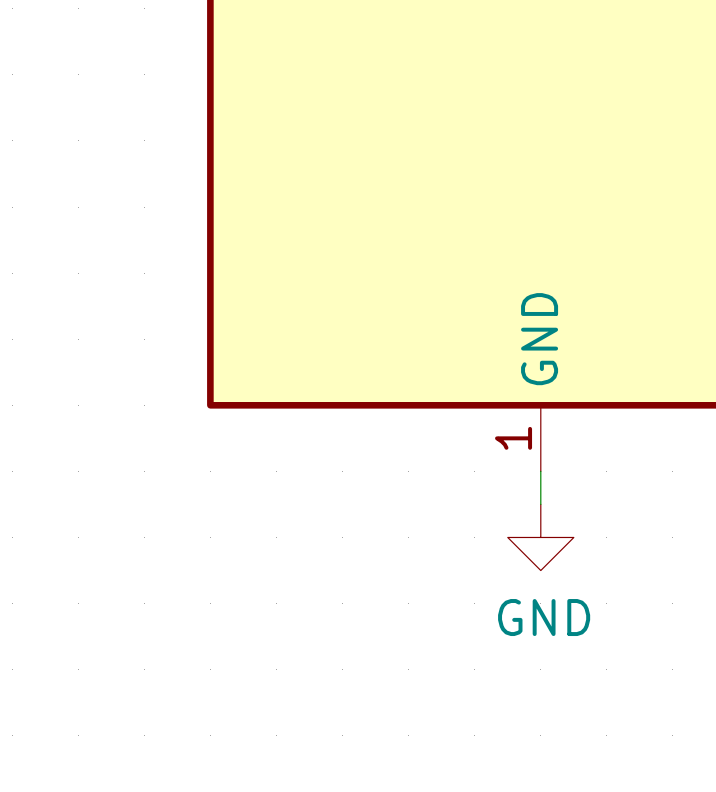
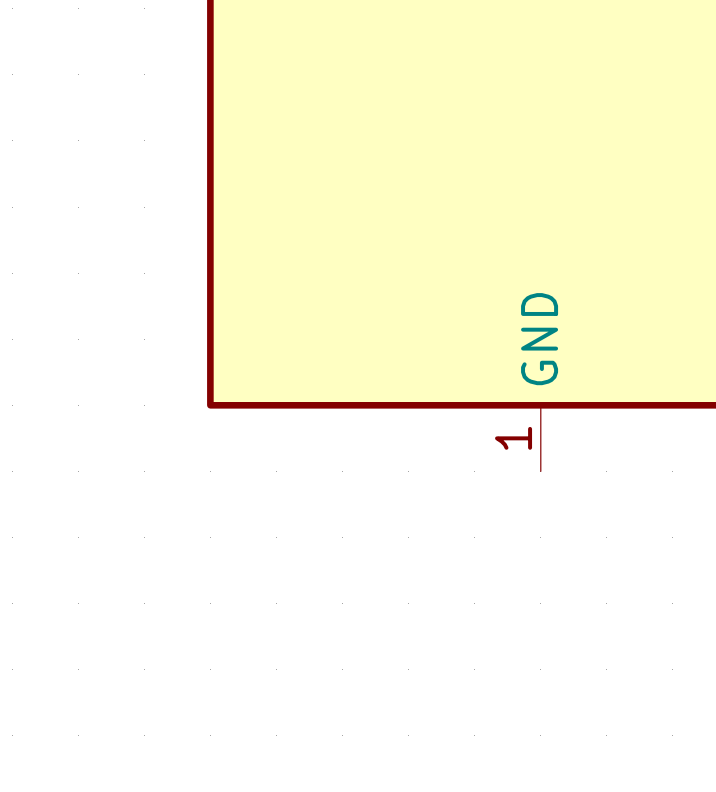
wire: (540, 471) (540, 504) -> none
power symbol: GND (540, 537) -> none

